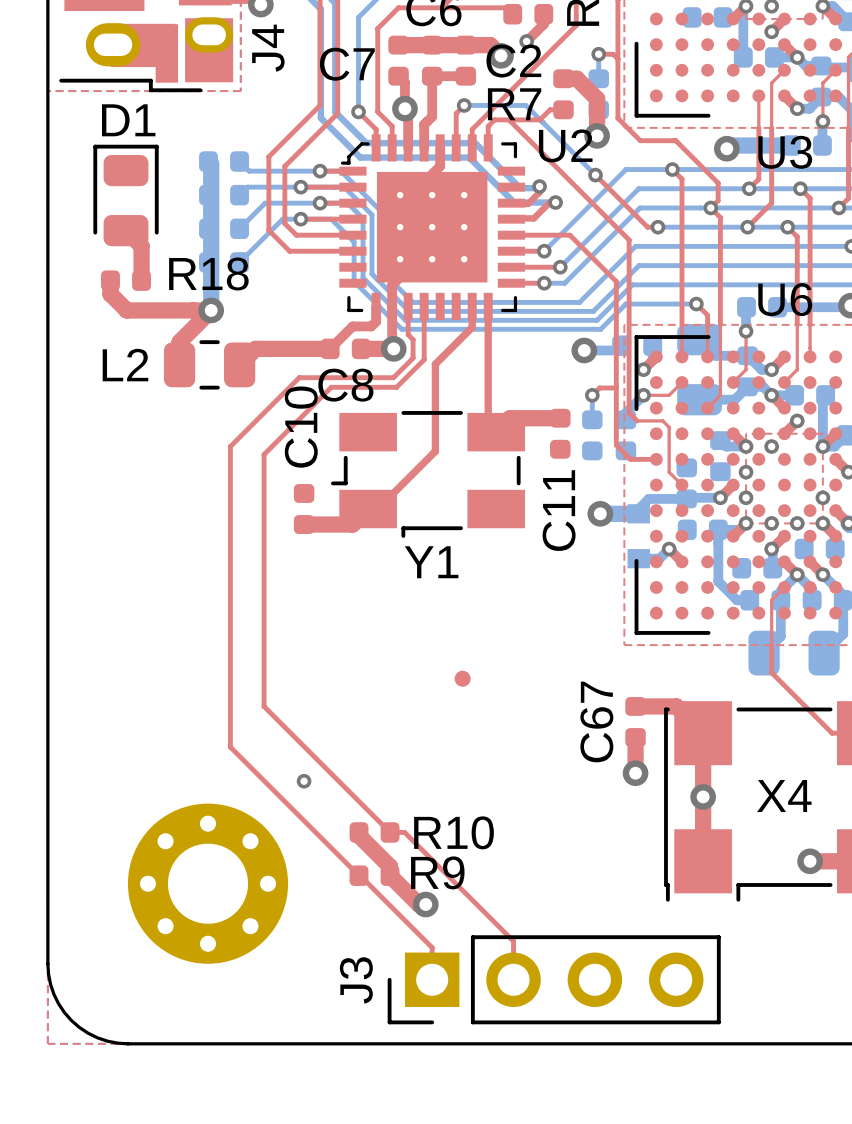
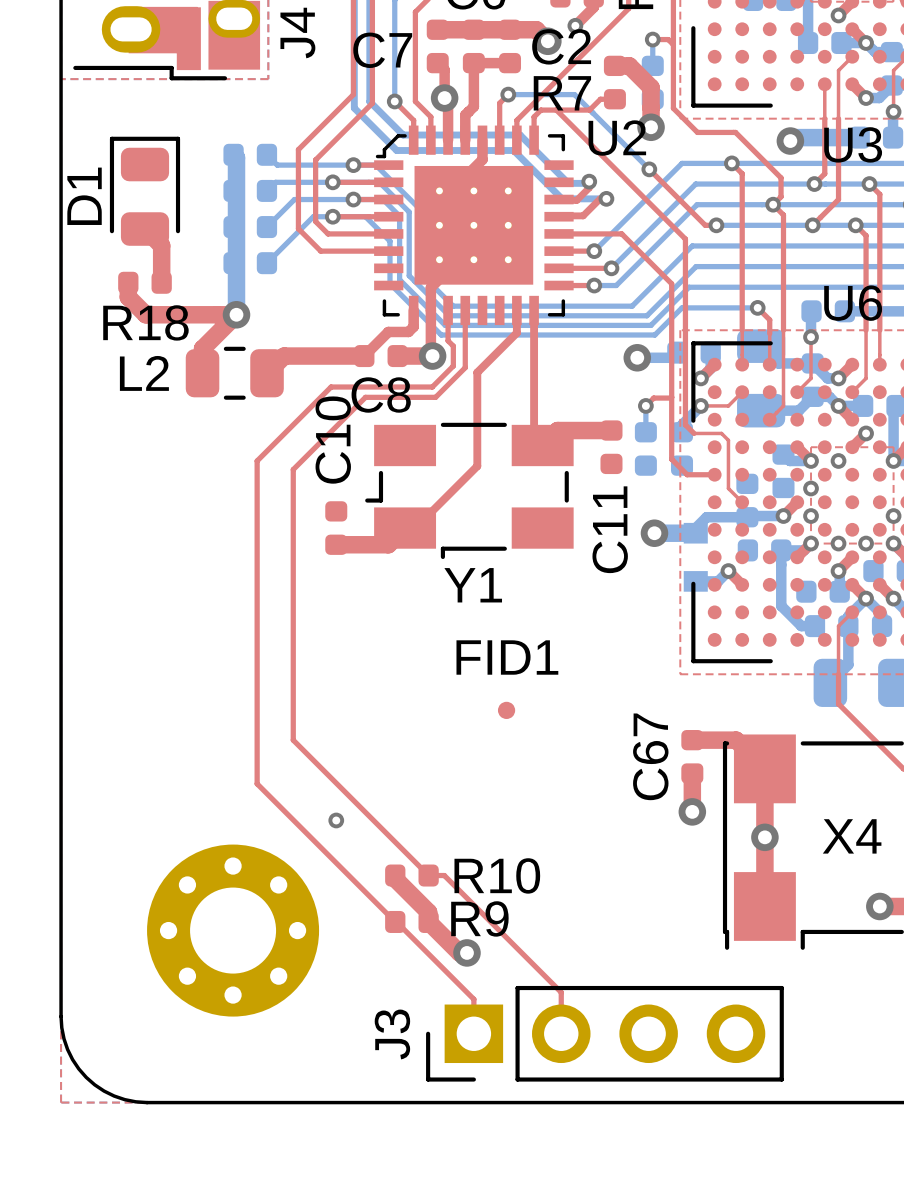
D1 name rotation: 0° (128, 120) -> 90° counterclockwise (84, 196)
D1 name position: D1 (128, 120) -> D1 (84, 196)
R18 name position: R18 (208, 274) -> R18 (145, 322)
FID1 name: none -> FID1 (507, 657)

